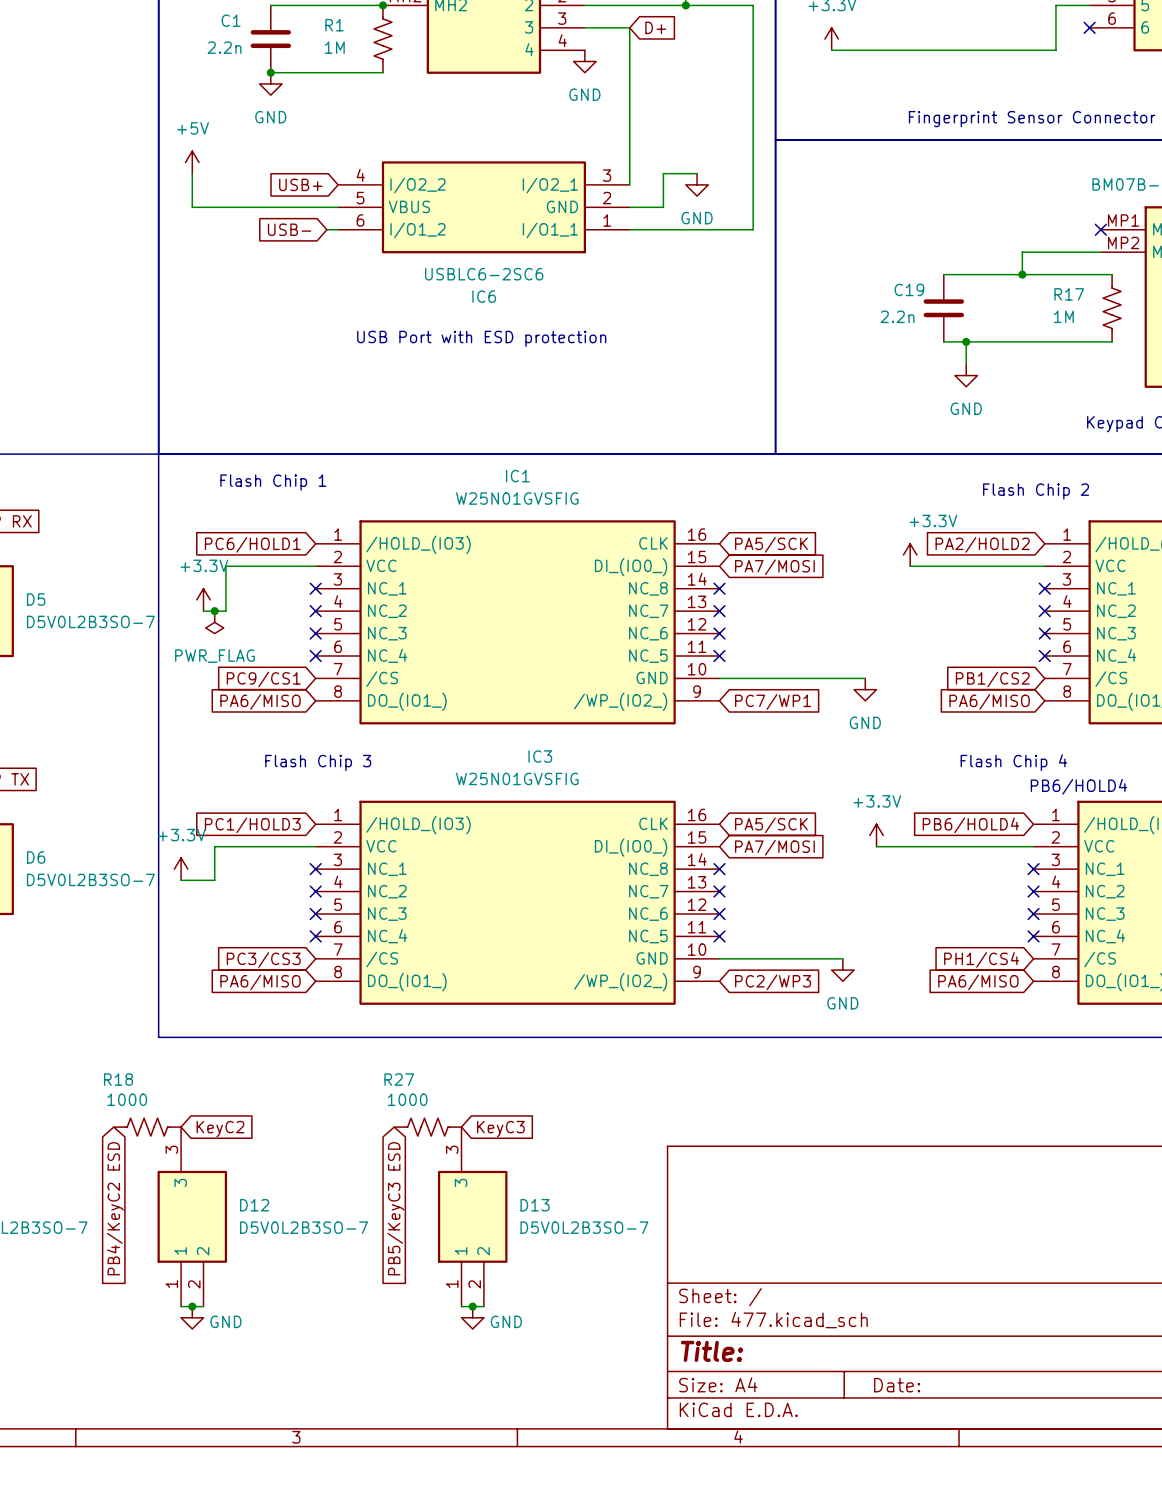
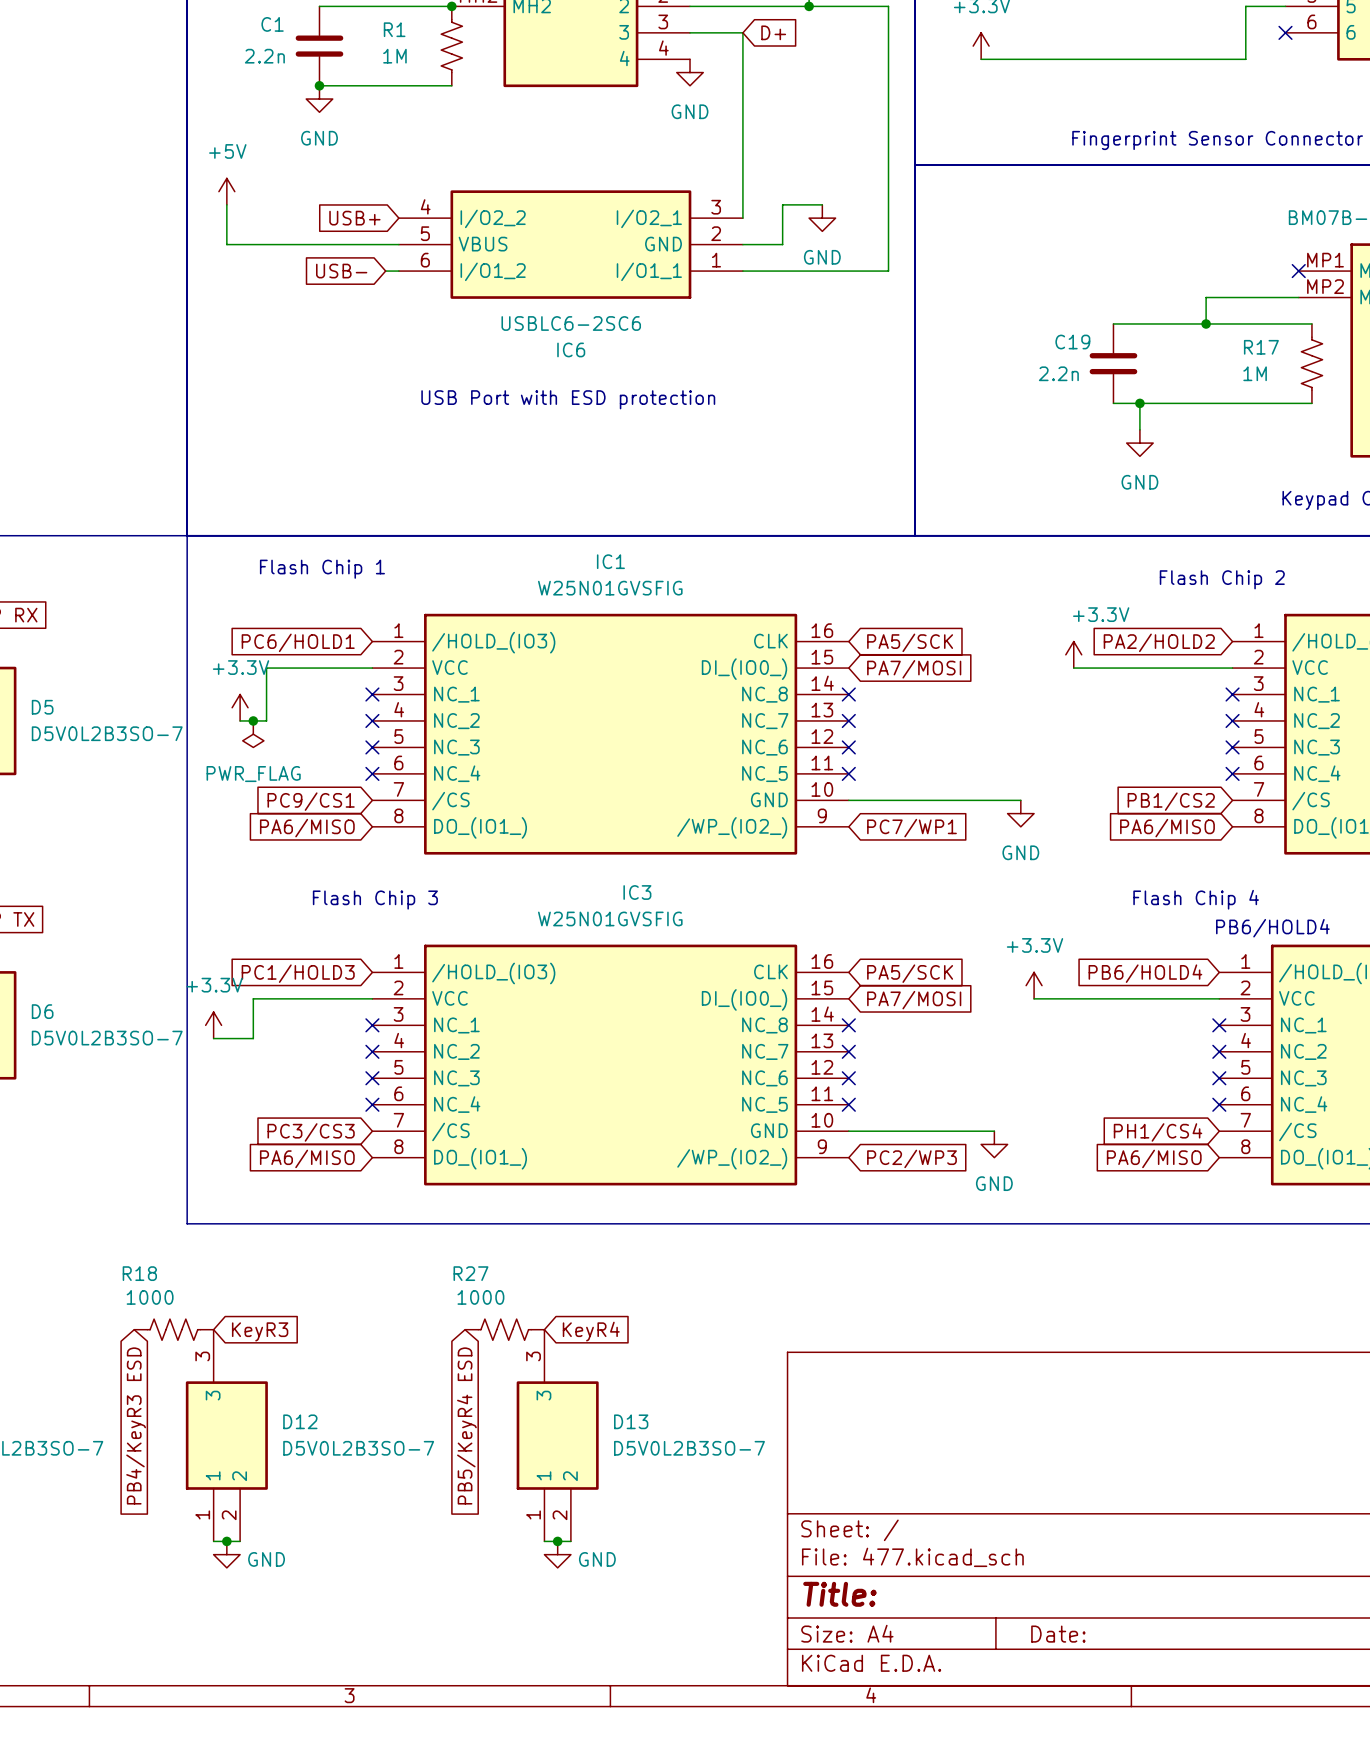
global label: KeyC2 (220, 1128) -> KeyR3 (260, 1331)
global label: KeyC3 (500, 1128) -> KeyR4 (591, 1331)
global label: PB4/KeyC2 ESD (115, 1208) -> PB4/KeyR3 ESD (136, 1425)
global label: PB5/KeyC3 ESD (395, 1208) -> PB5/KeyR4 ESD (466, 1425)

